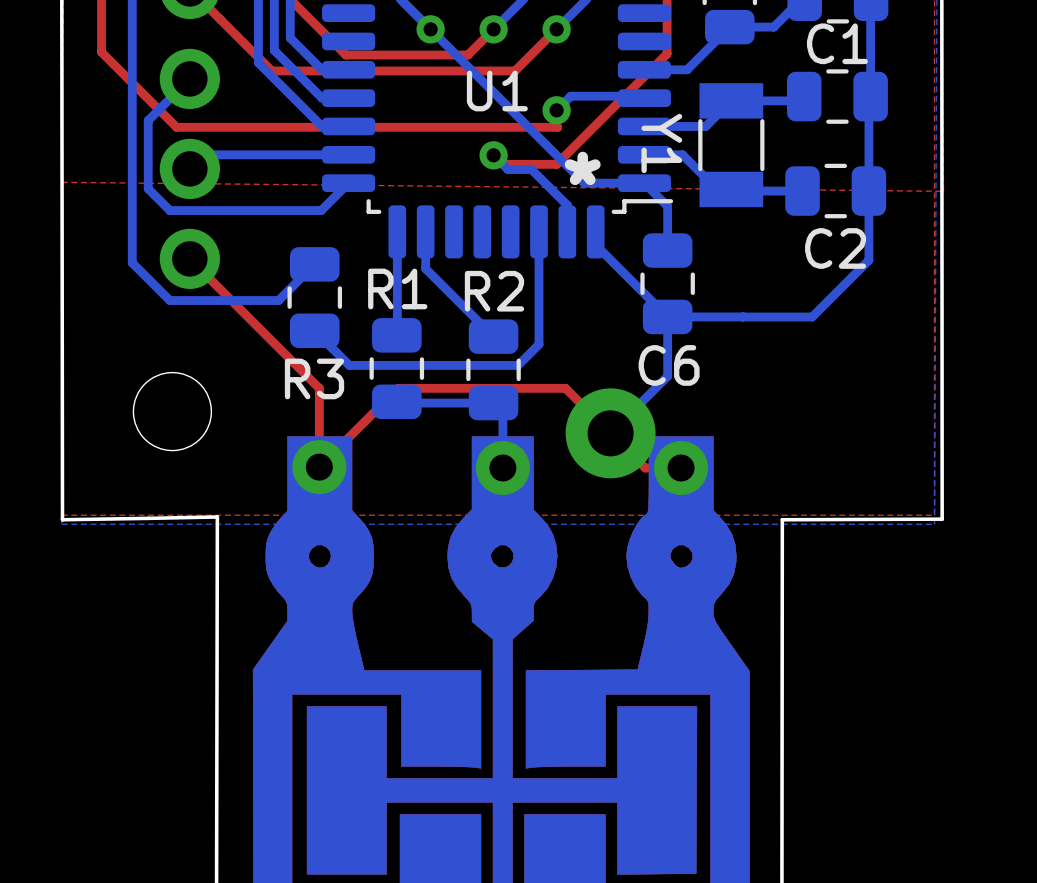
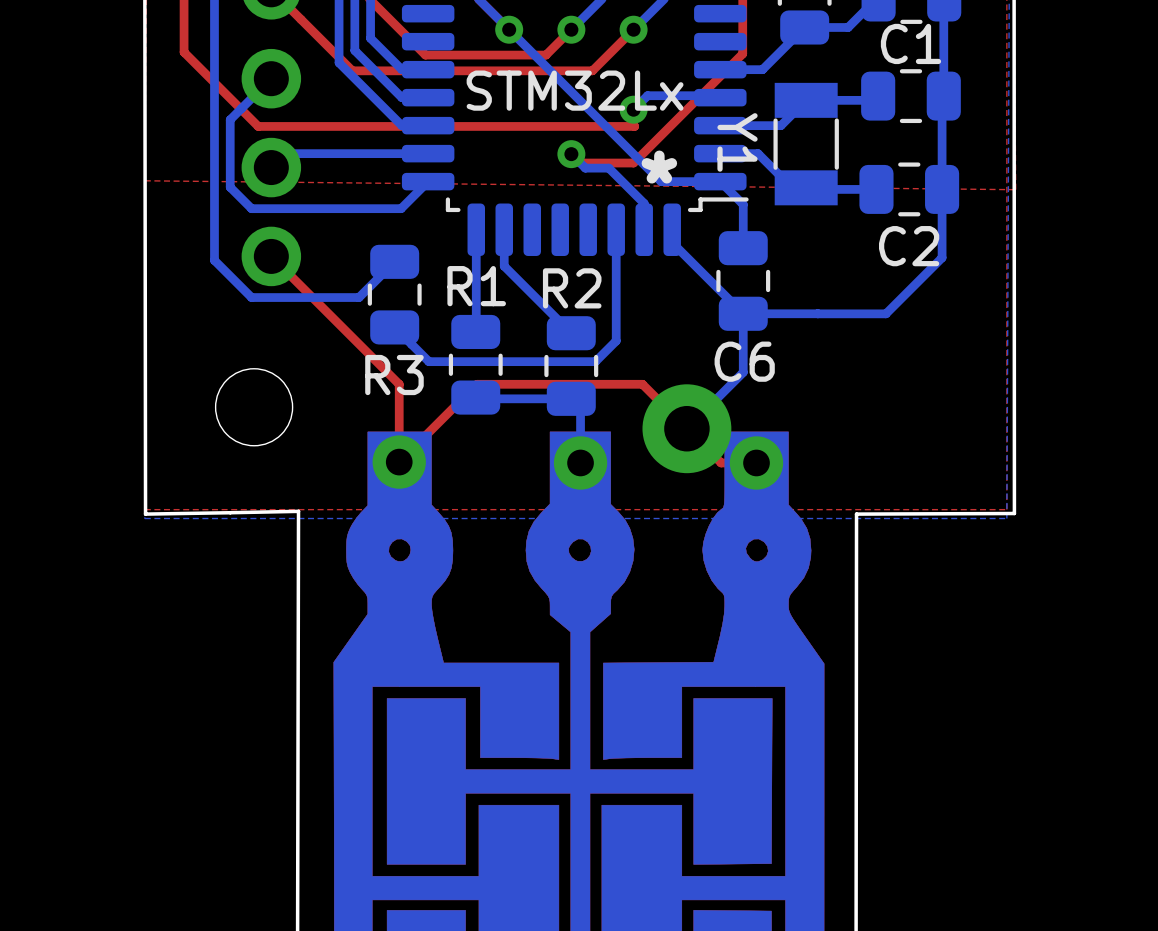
U1 name: U1 (497, 91) -> STM32Lx (575, 90)

